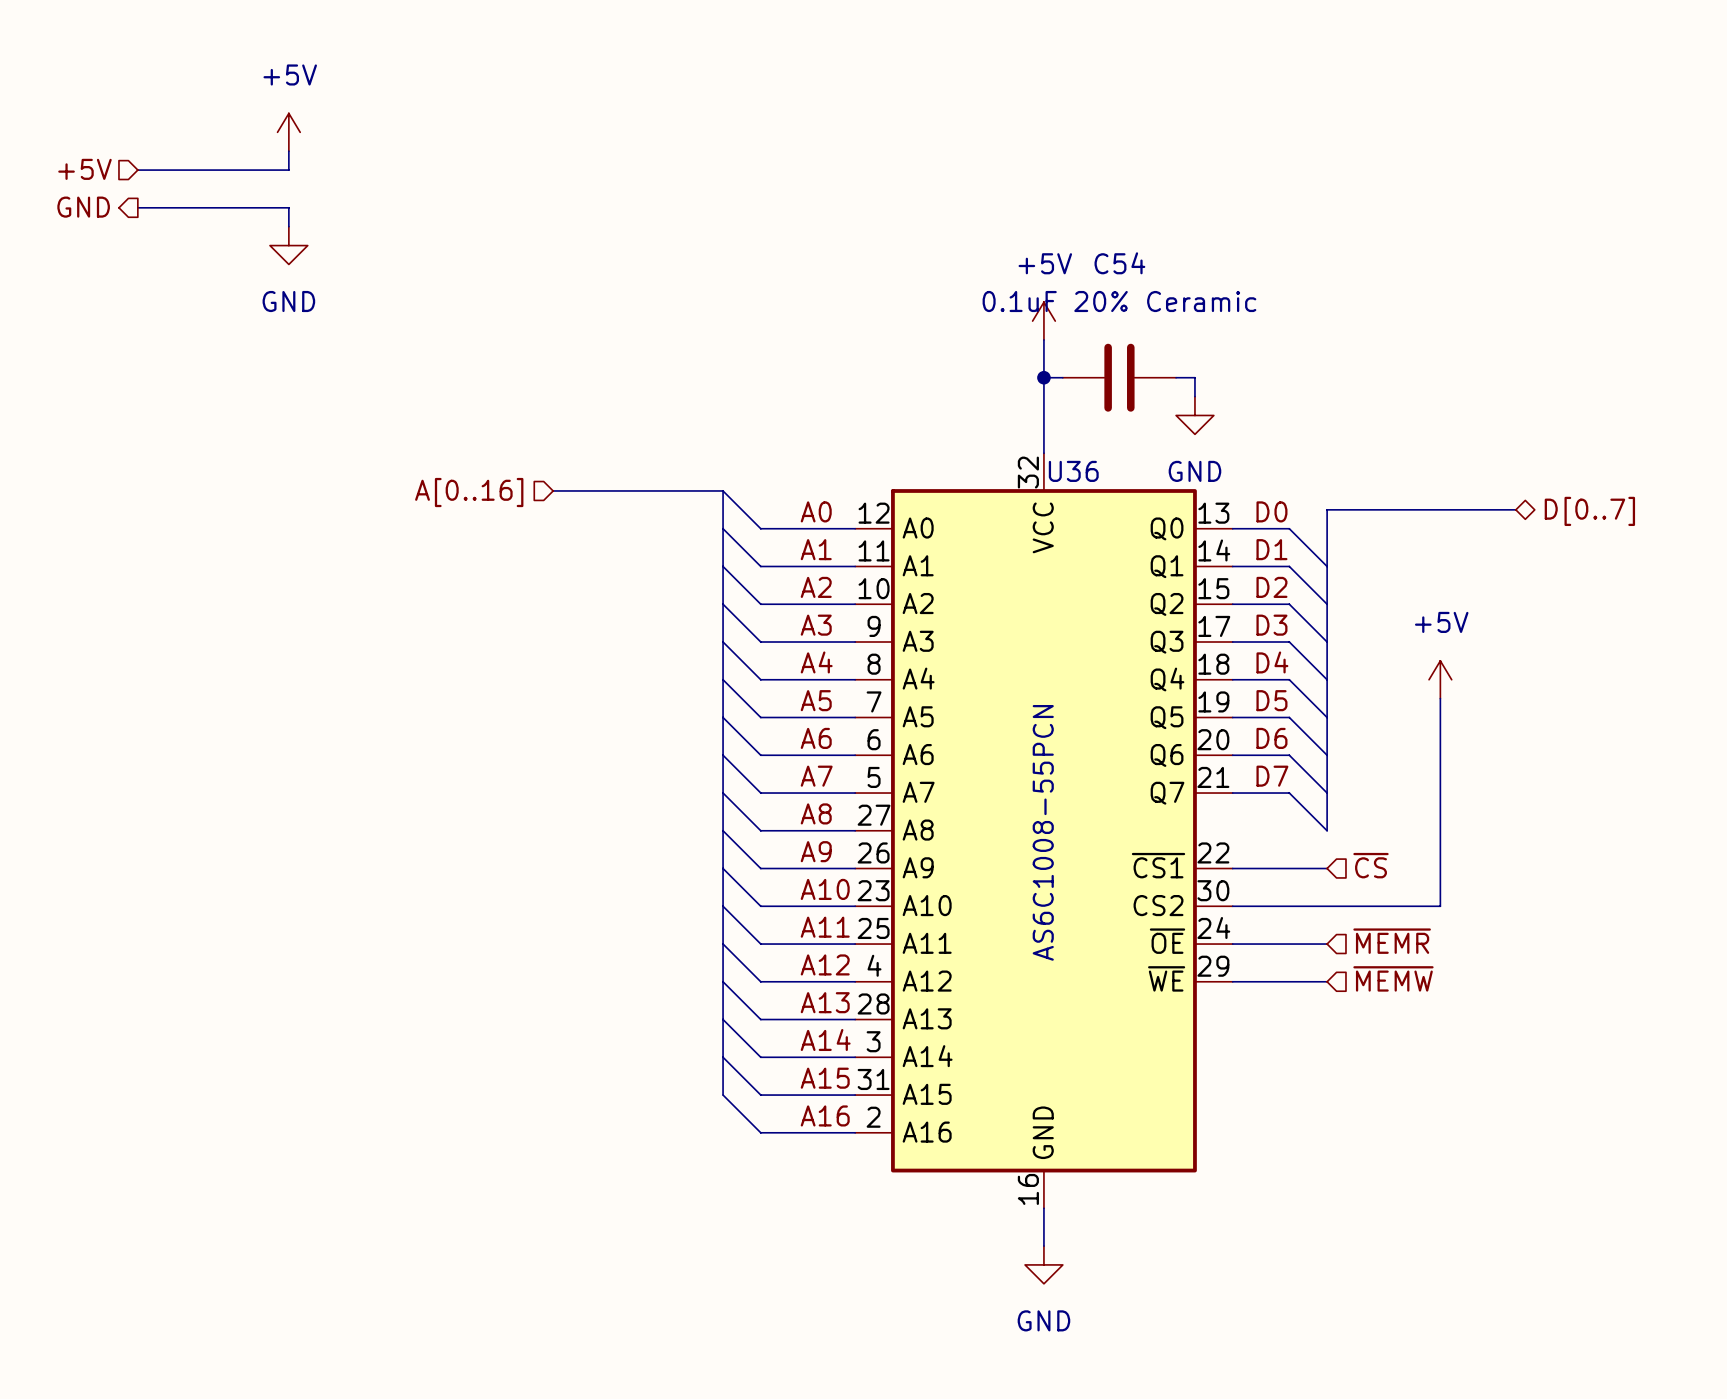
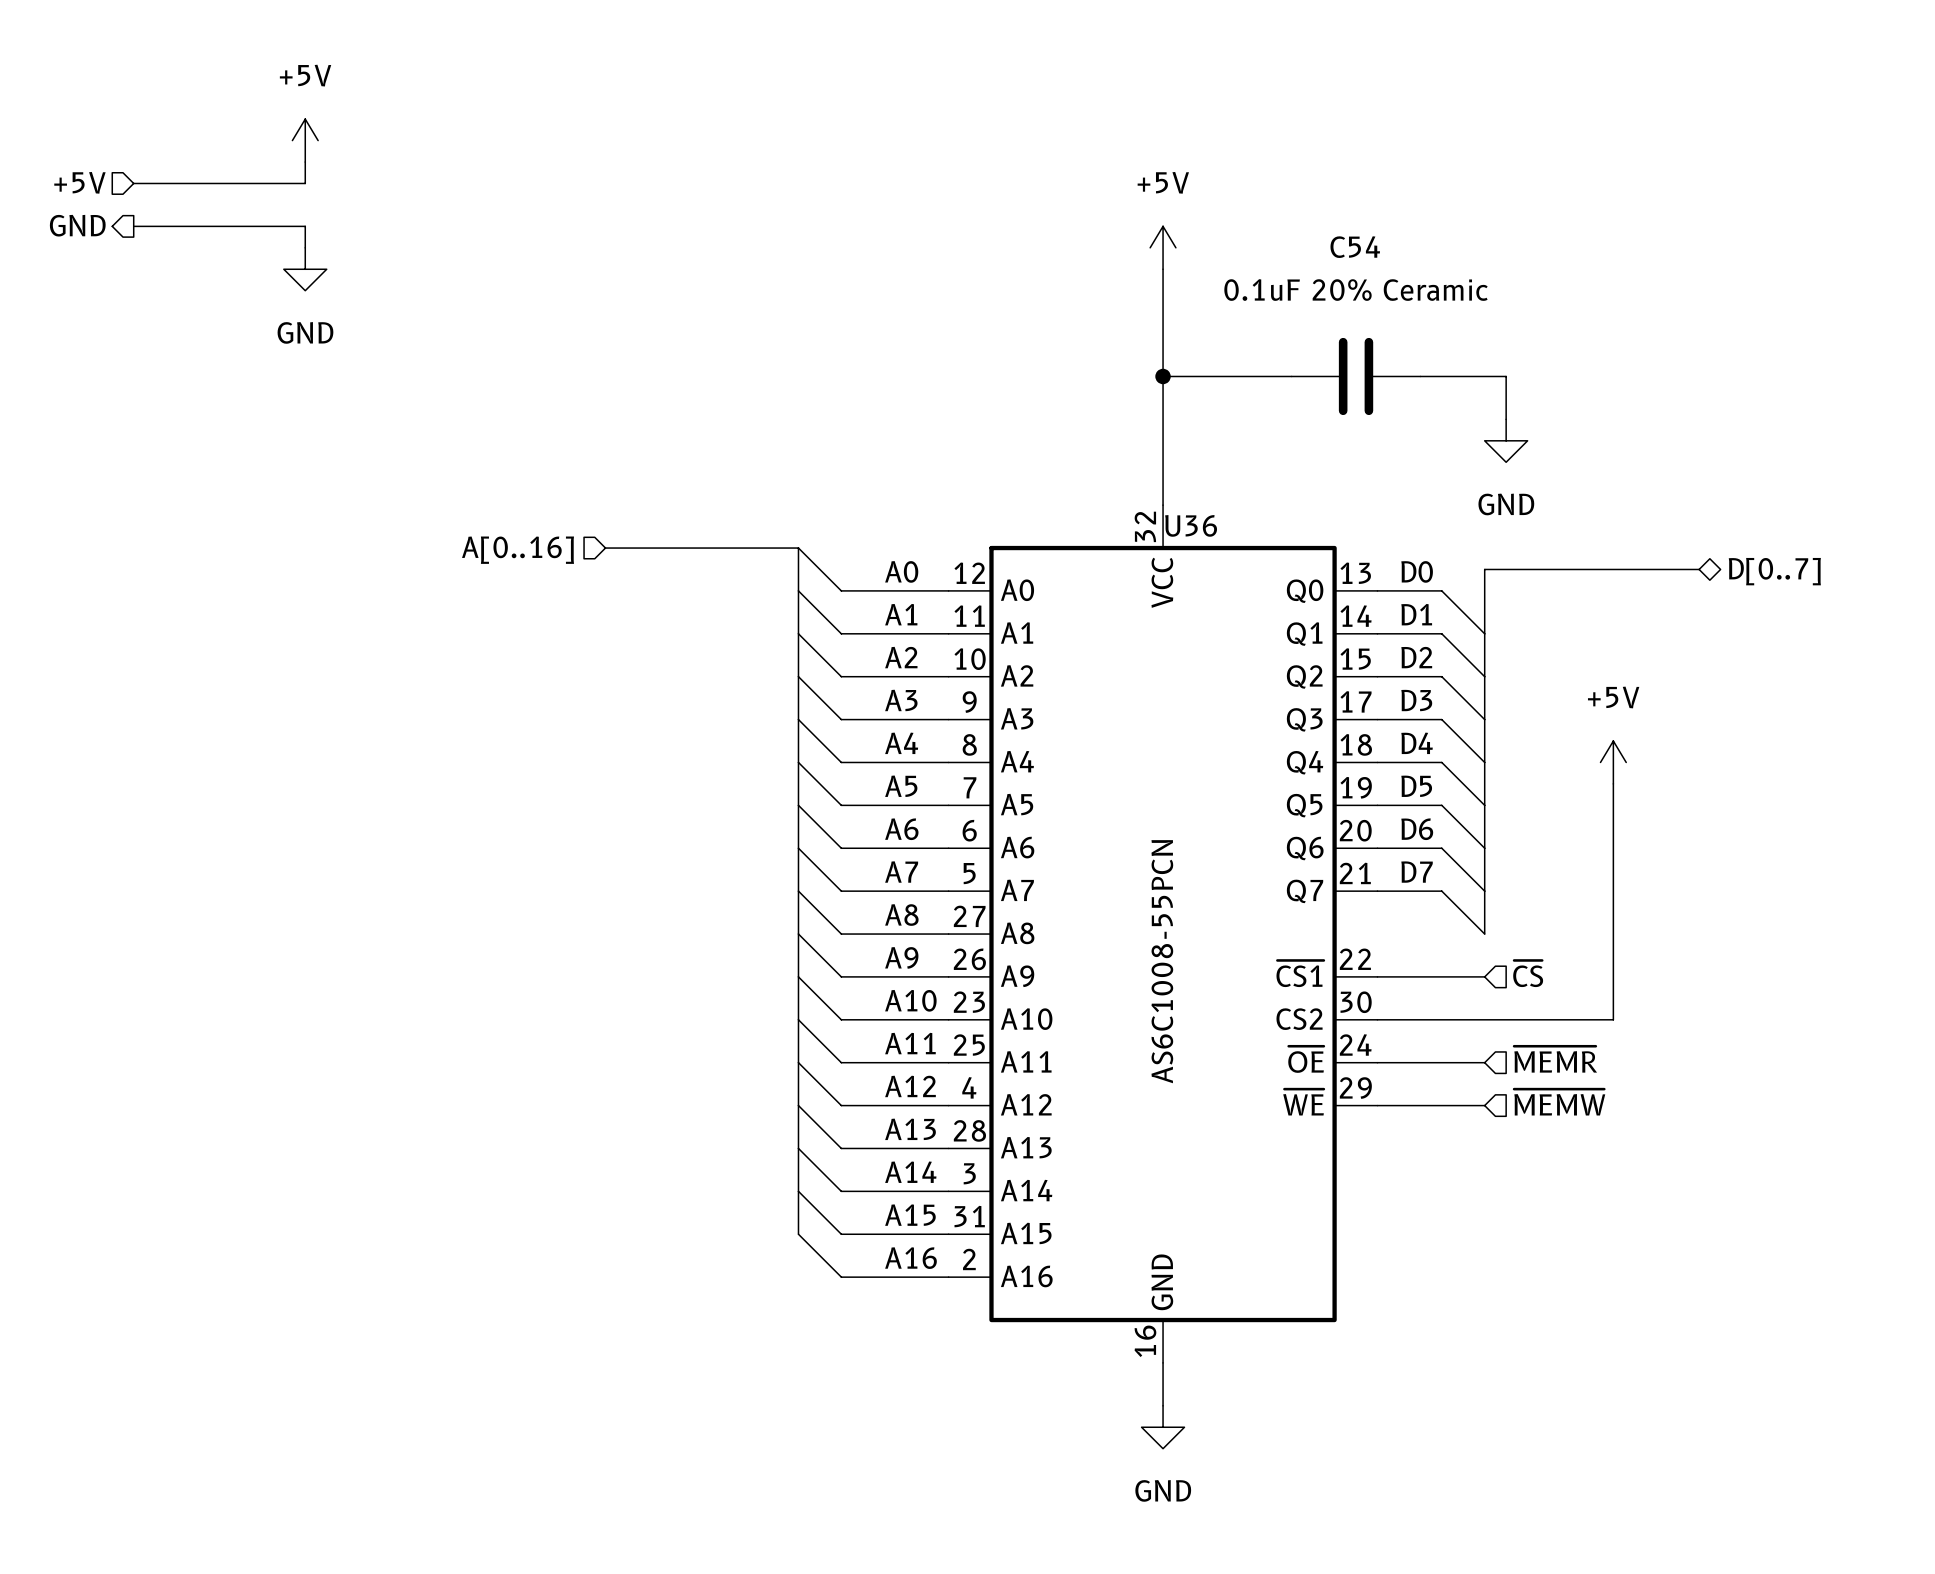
wire: none -> (1163, 269) (1163, 376) (1291, 376)
power symbol position: +5V (1043, 321) -> +5V (1163, 247)
wire: none -> (1420, 376) (1506, 376) (1506, 419)
wire: (1043, 377) (1062, 377) -> none
junction position: (1043, 377) -> (1163, 376)
C54 position: (1119, 377) -> (1356, 376)
wire: (1176, 377) (1194, 377) (1194, 396) -> none
power symbol position: GND (1194, 415) -> GND (1506, 440)

